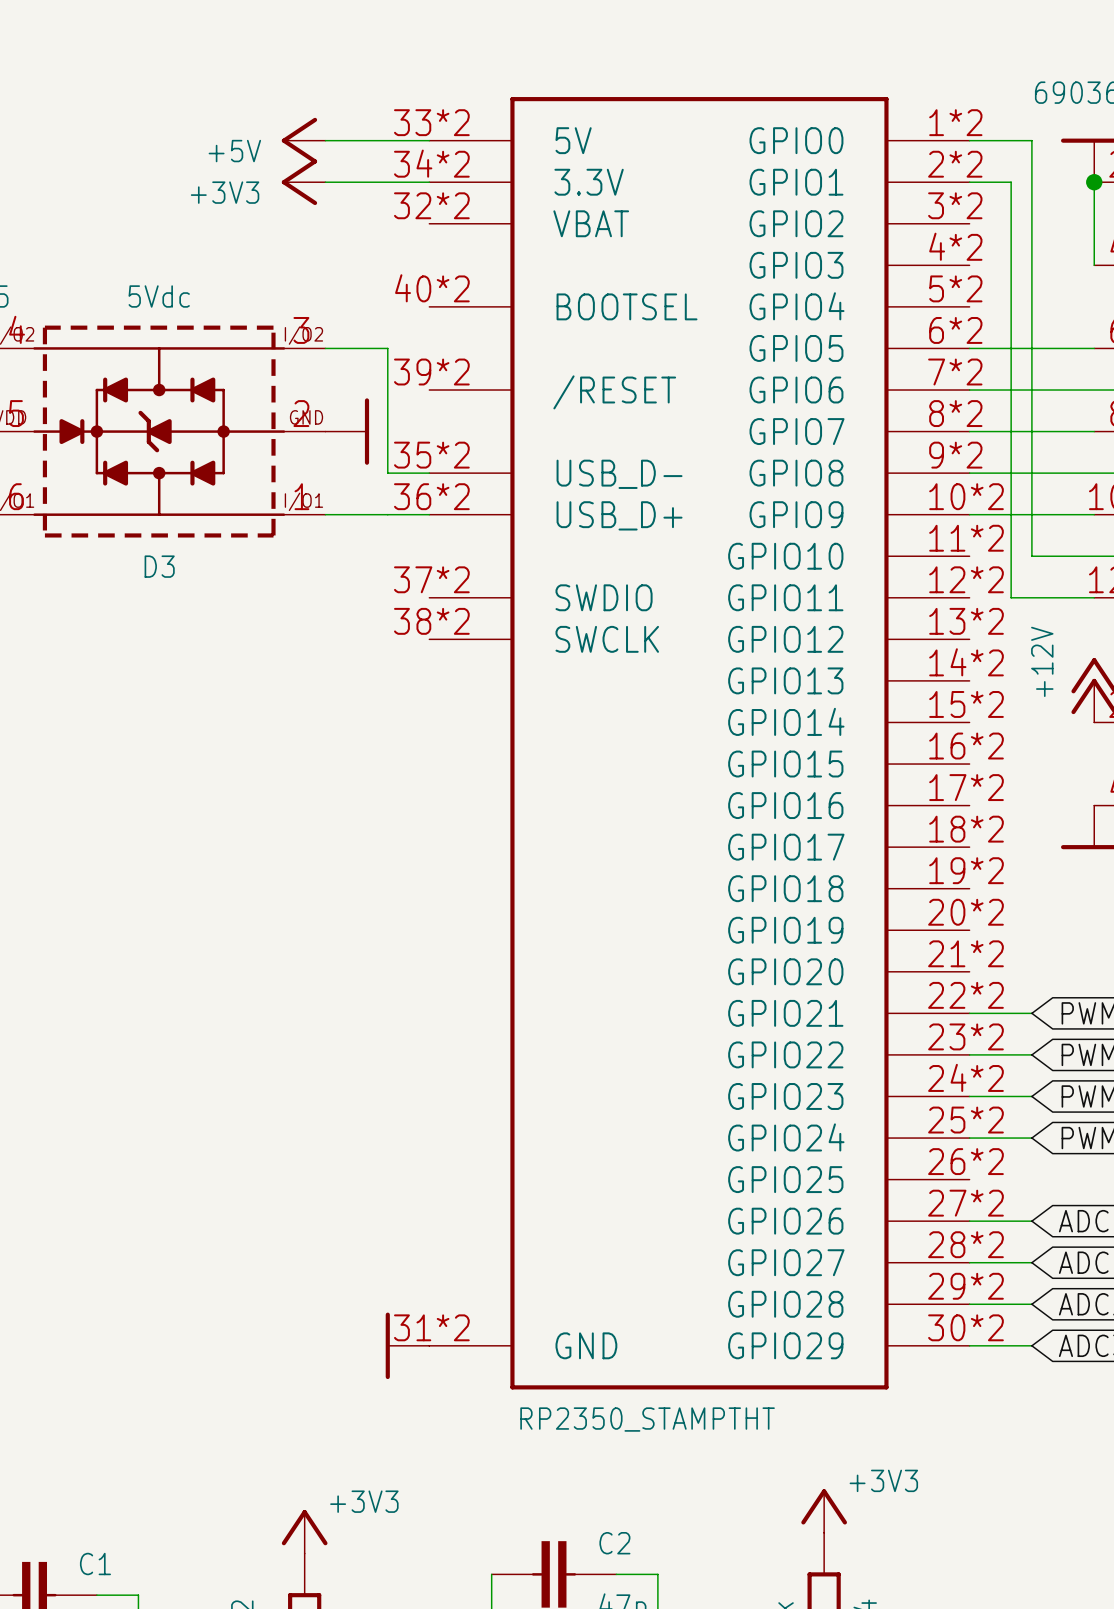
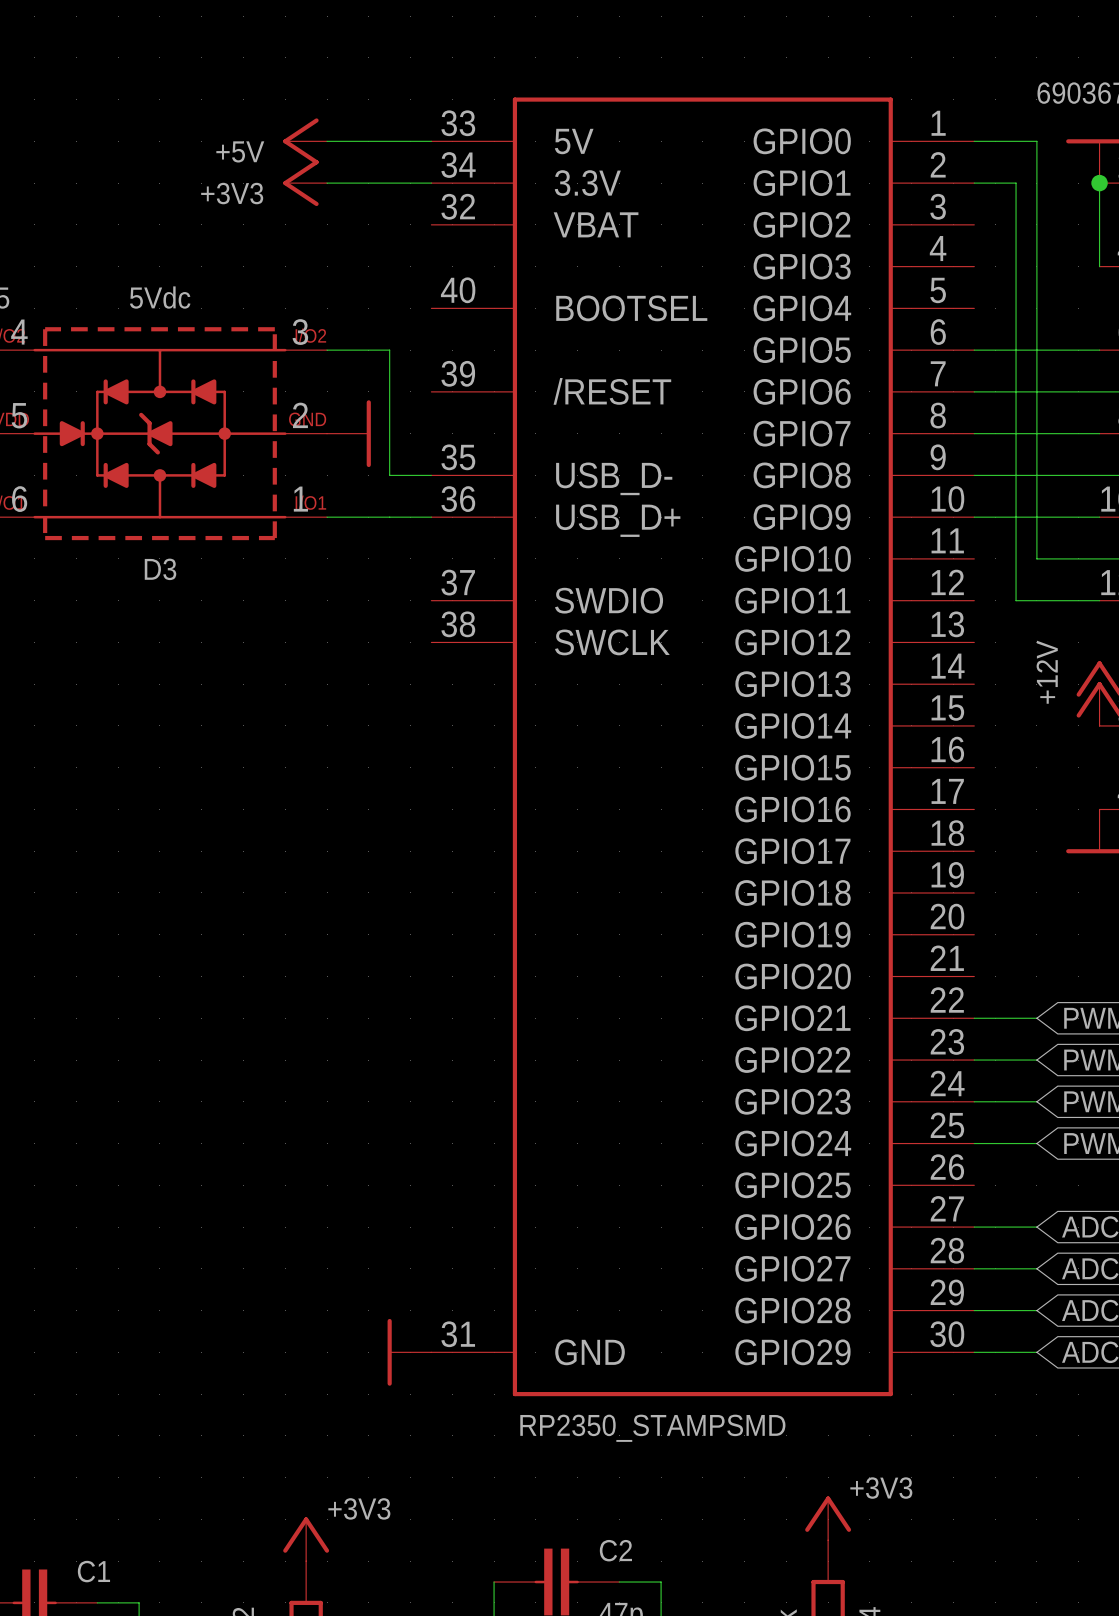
part symbol: [429, 97, 970, 1390] -> [431, 97, 975, 1397]
part value: RP2350_STAMPTHT (647, 1419) -> RP2350_STAMPSMD (652, 1428)

